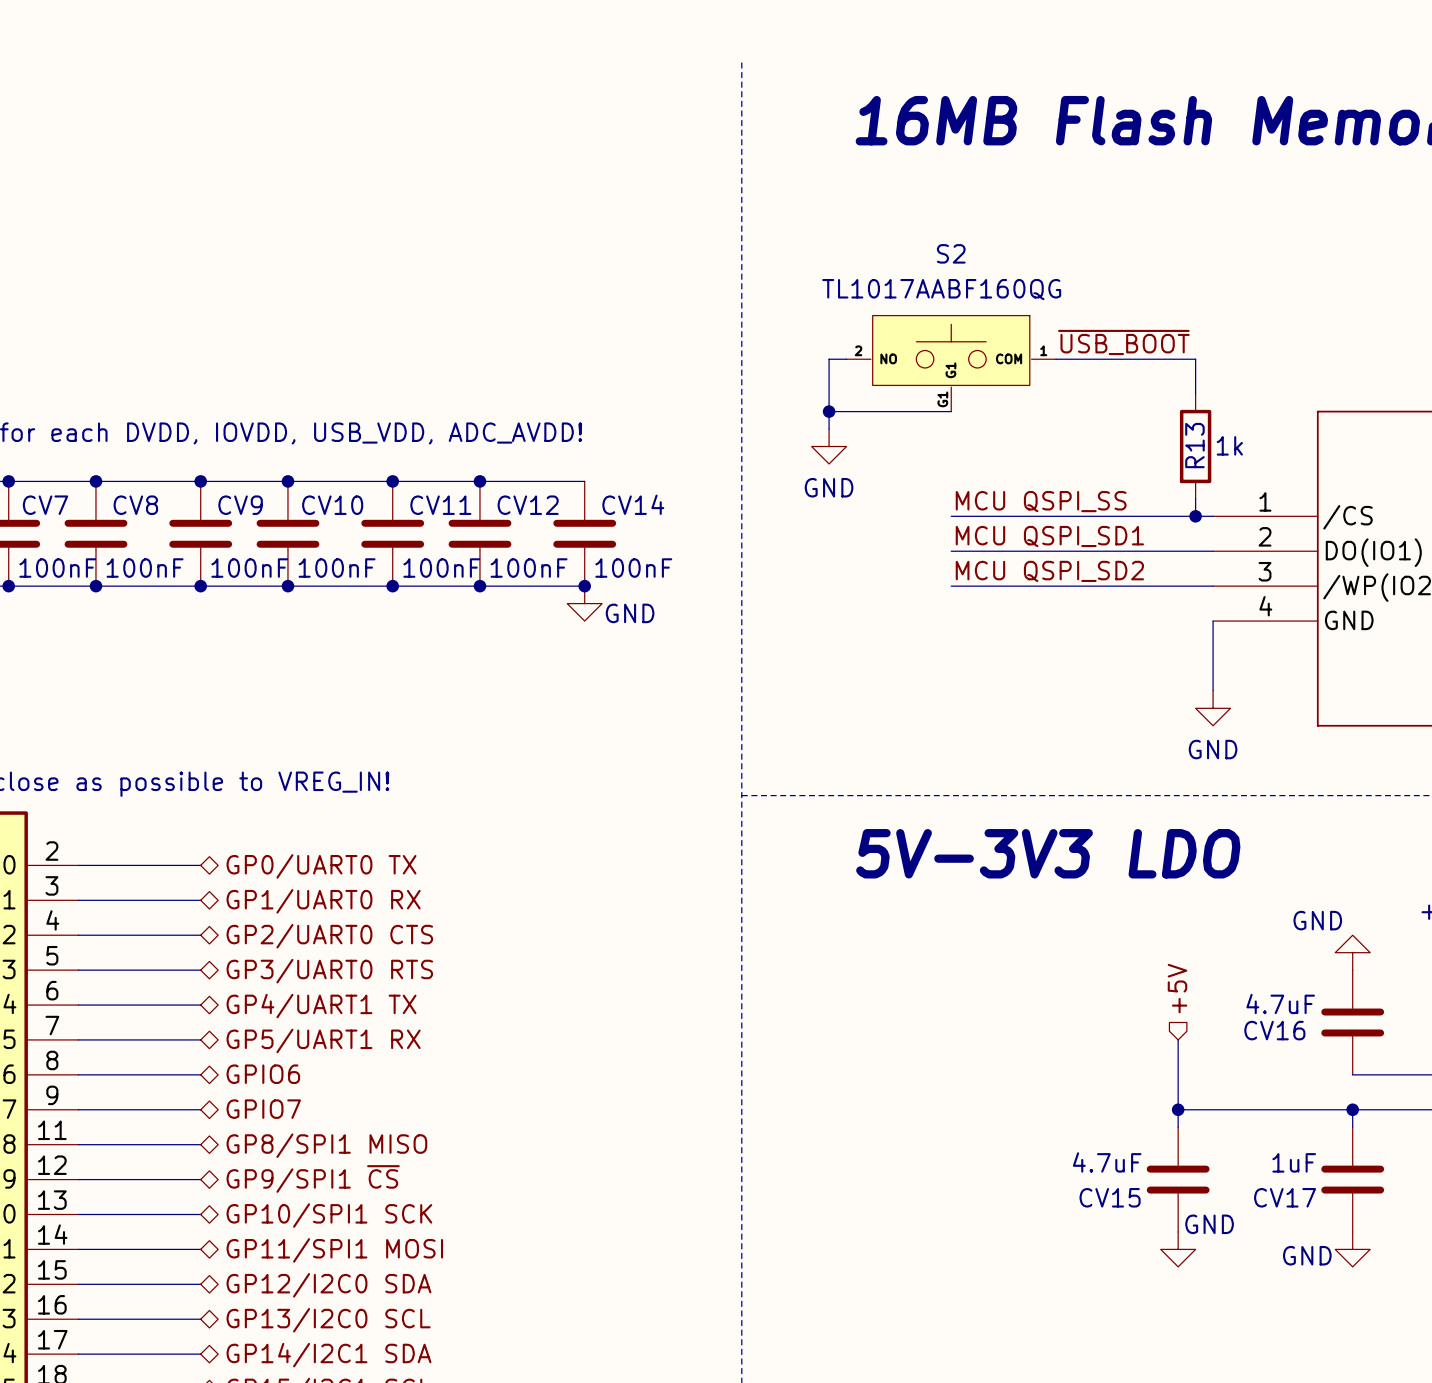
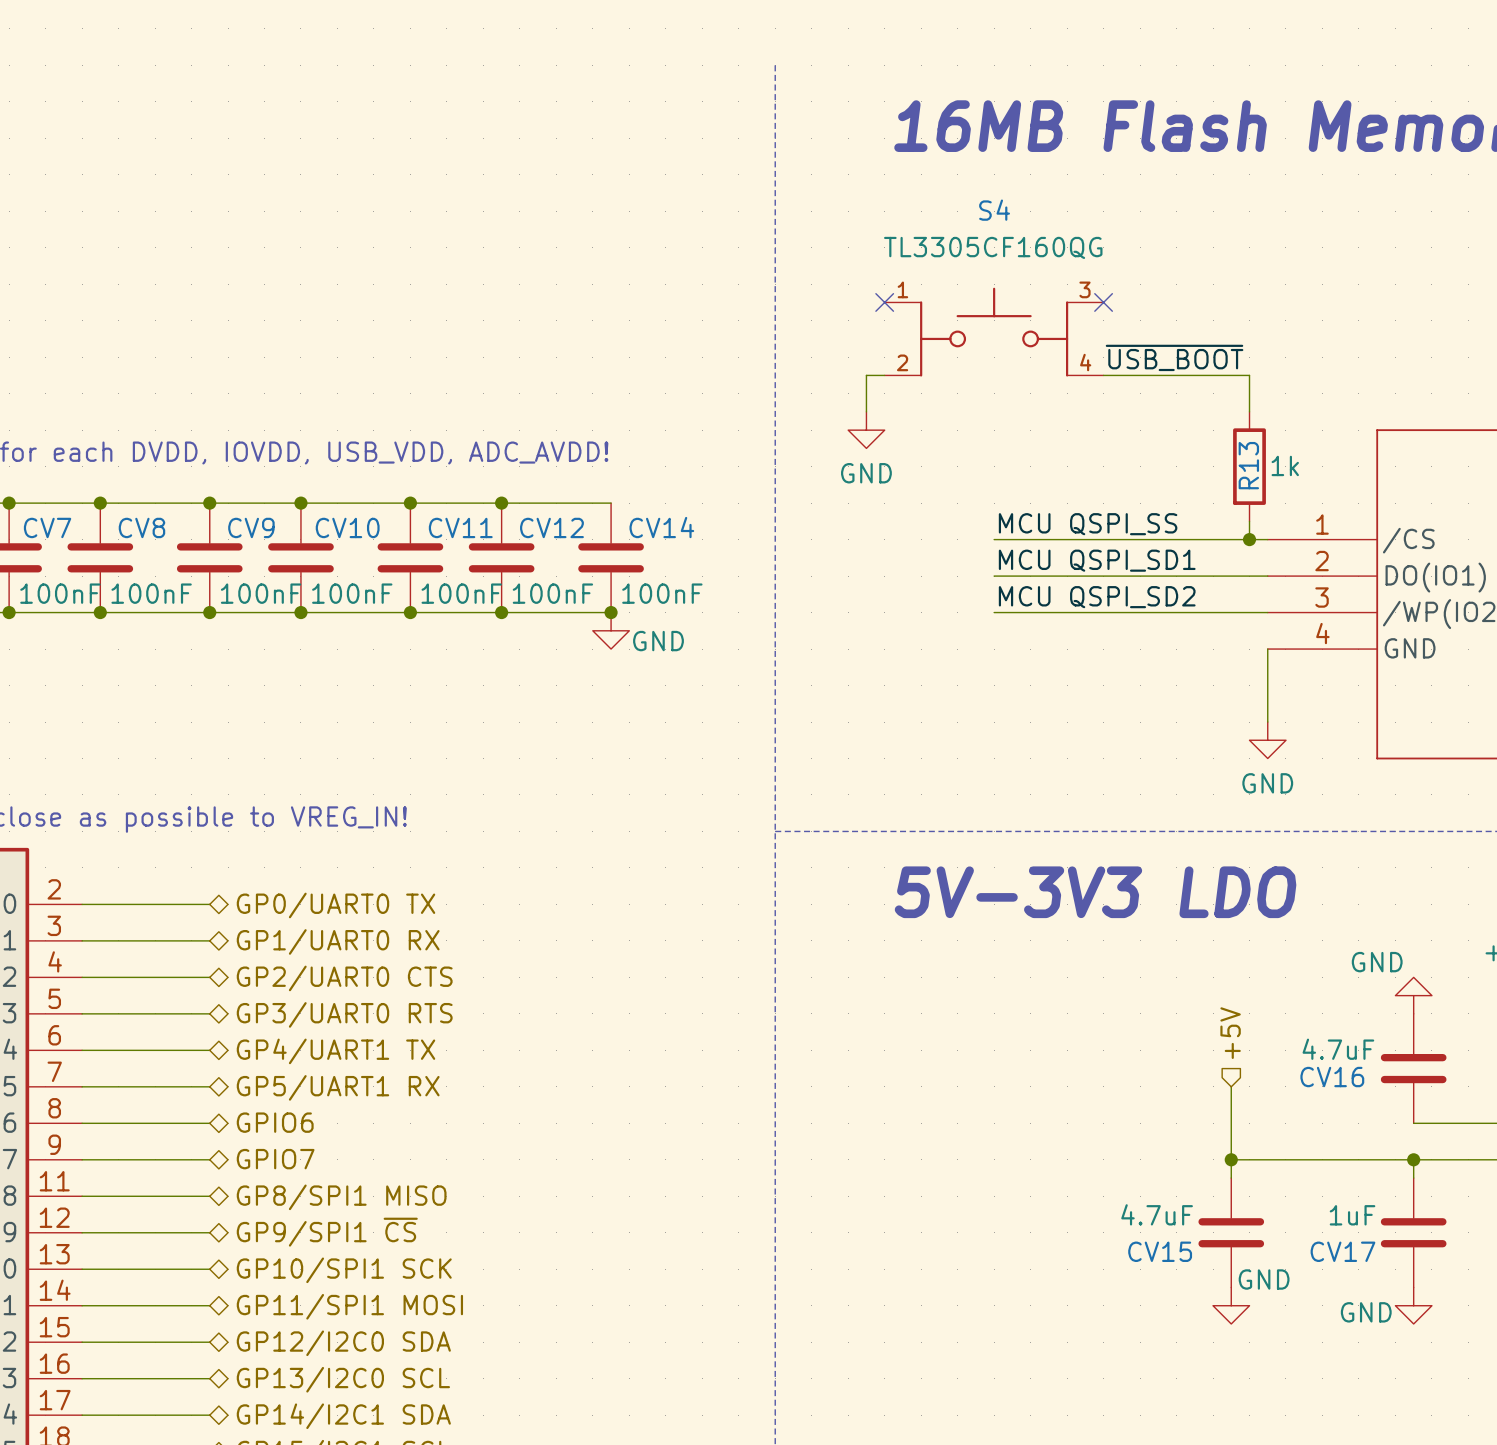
no-connect mark: none -> (884, 302)
no-connect mark: none -> (1103, 302)
S4: none -> TL3305CF160QG (994, 332)
S2: TL1017AABF160QG (951, 363) -> none
wire: (829, 411) (951, 411) -> none
junction: (829, 411) -> none
power symbol position: GND (829, 446) -> GND (866, 430)

